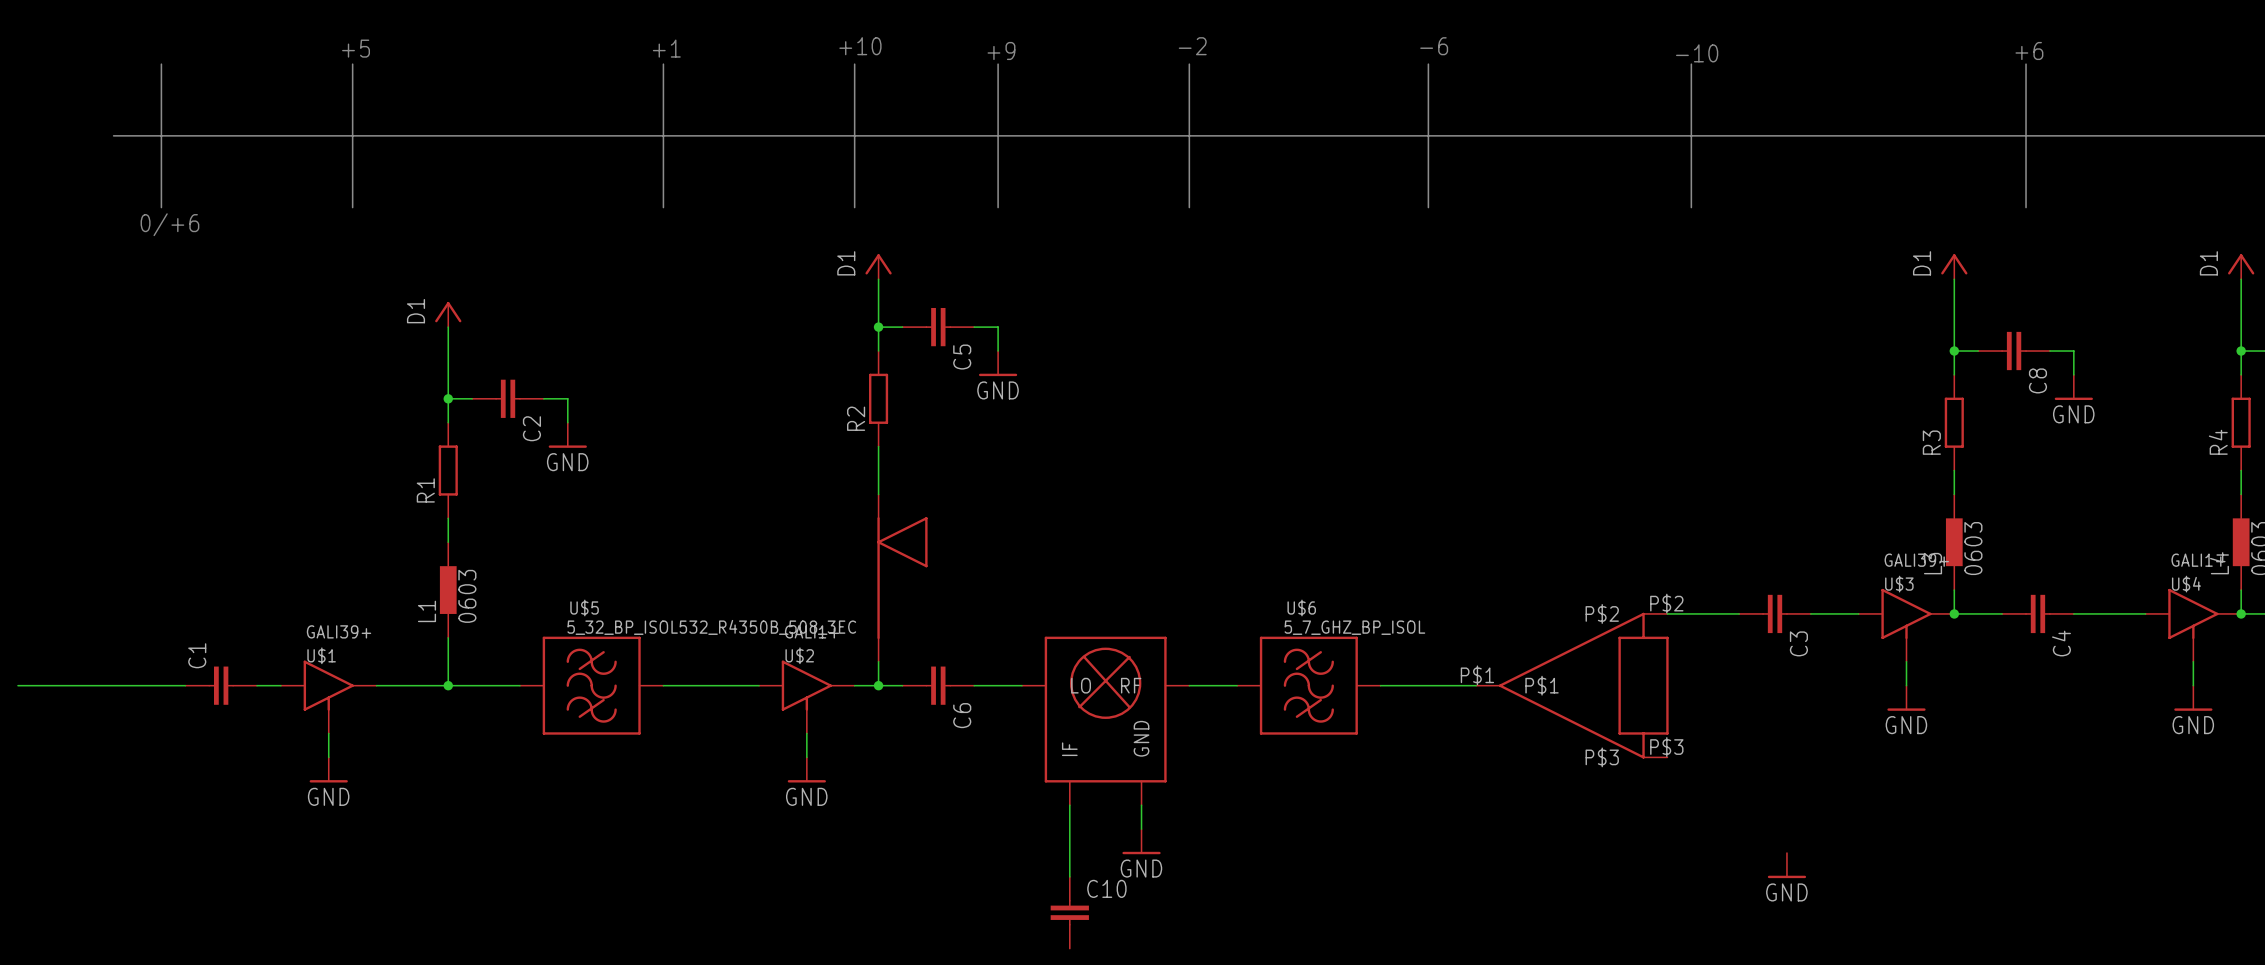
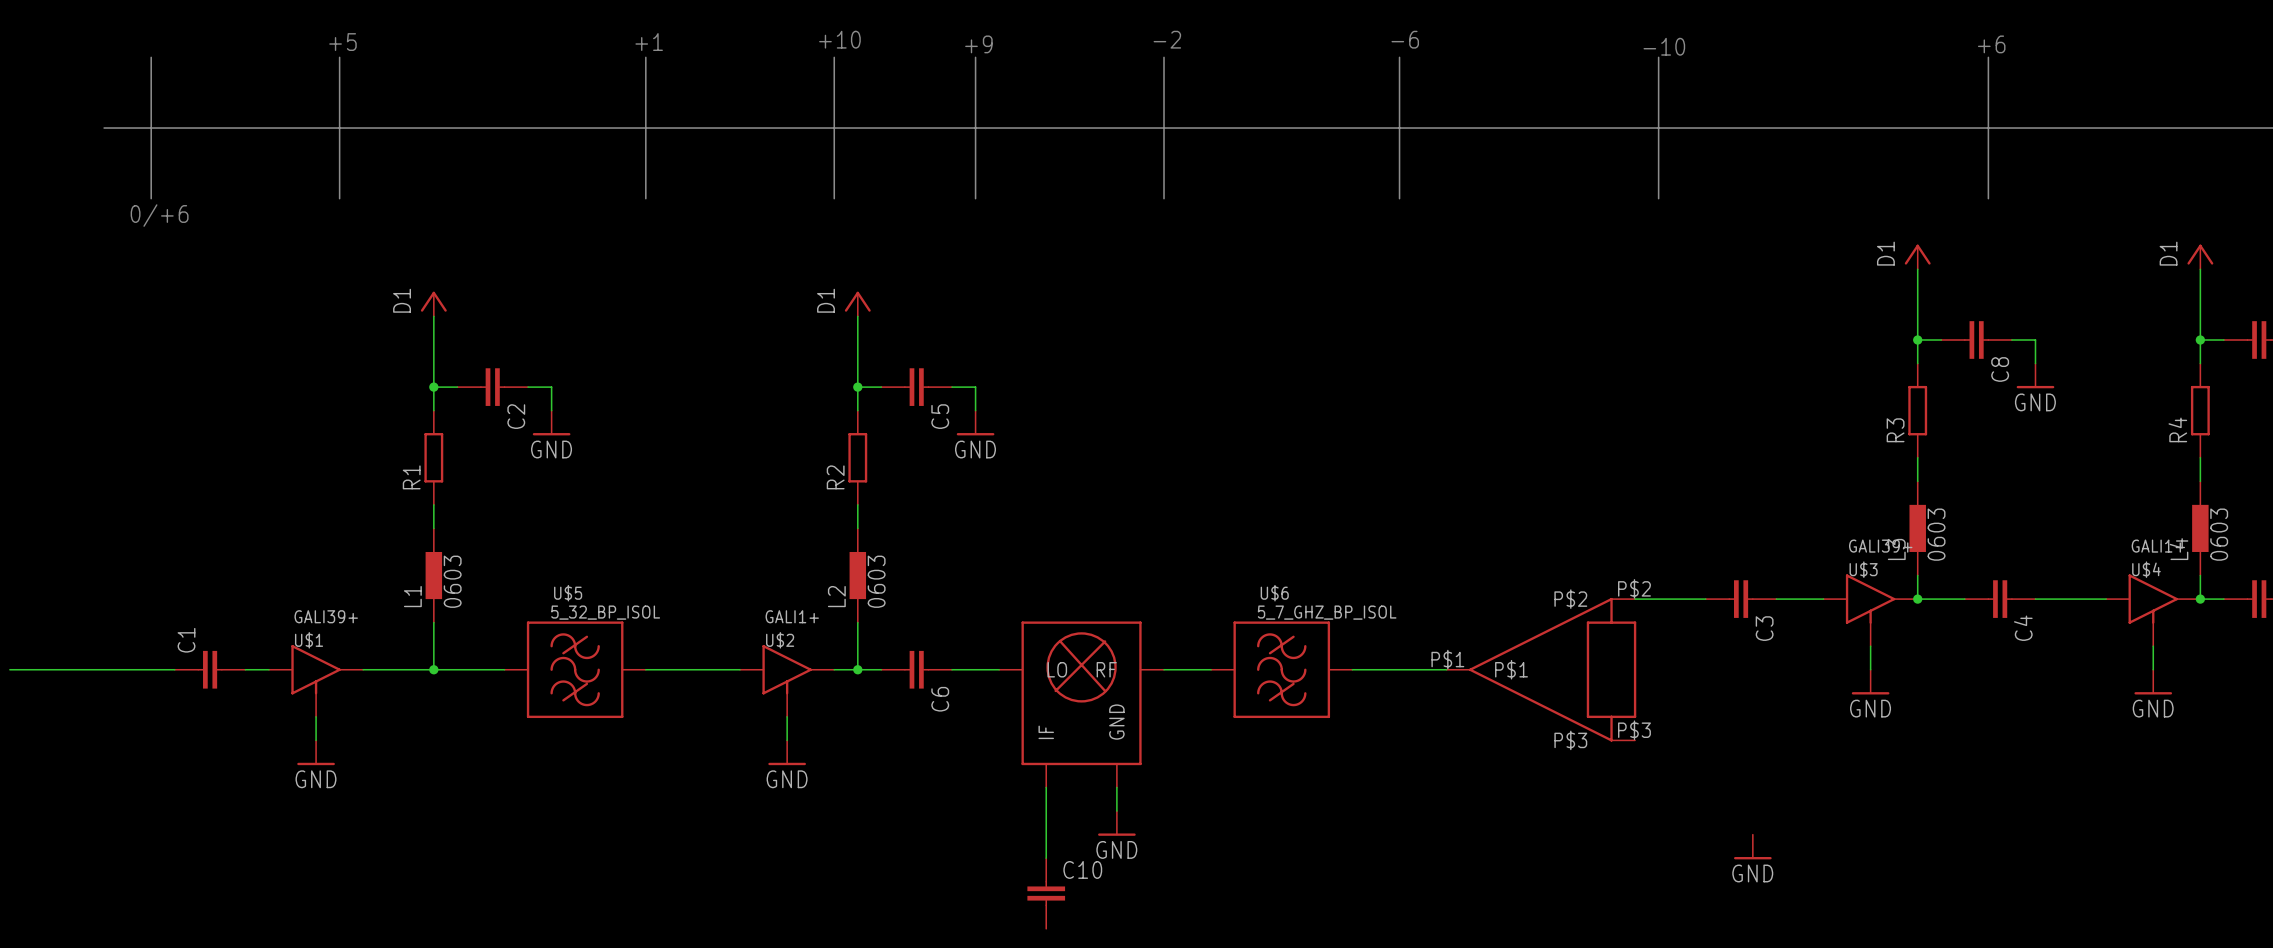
power symbol position: D1 (878, 266) -> D1 (857, 304)
wire: (878, 279) (878, 327) (902, 327) -> none
junction: (878, 327) -> none
C5 position: (938, 327) -> (916, 387)
wire: (974, 327) (998, 327) (998, 351) -> (952, 387) (975, 387) (975, 410)
wire: none -> (857, 340) (857, 410)
power symbol position: GND (998, 363) -> GND (975, 423)
wire: none -> (857, 387) (881, 387)
R2 position: (878, 398) -> (857, 457)
junction: none -> (857, 387)
wire: (878, 446) (878, 494) -> none
part: (902, 578) -> none
L2: none -> 0603 (857, 575)
U$5 value: 5_32_BP_ISOL532_R4350B_508_3EC (711, 627) -> 5_32_BP_ISOL (605, 612)

